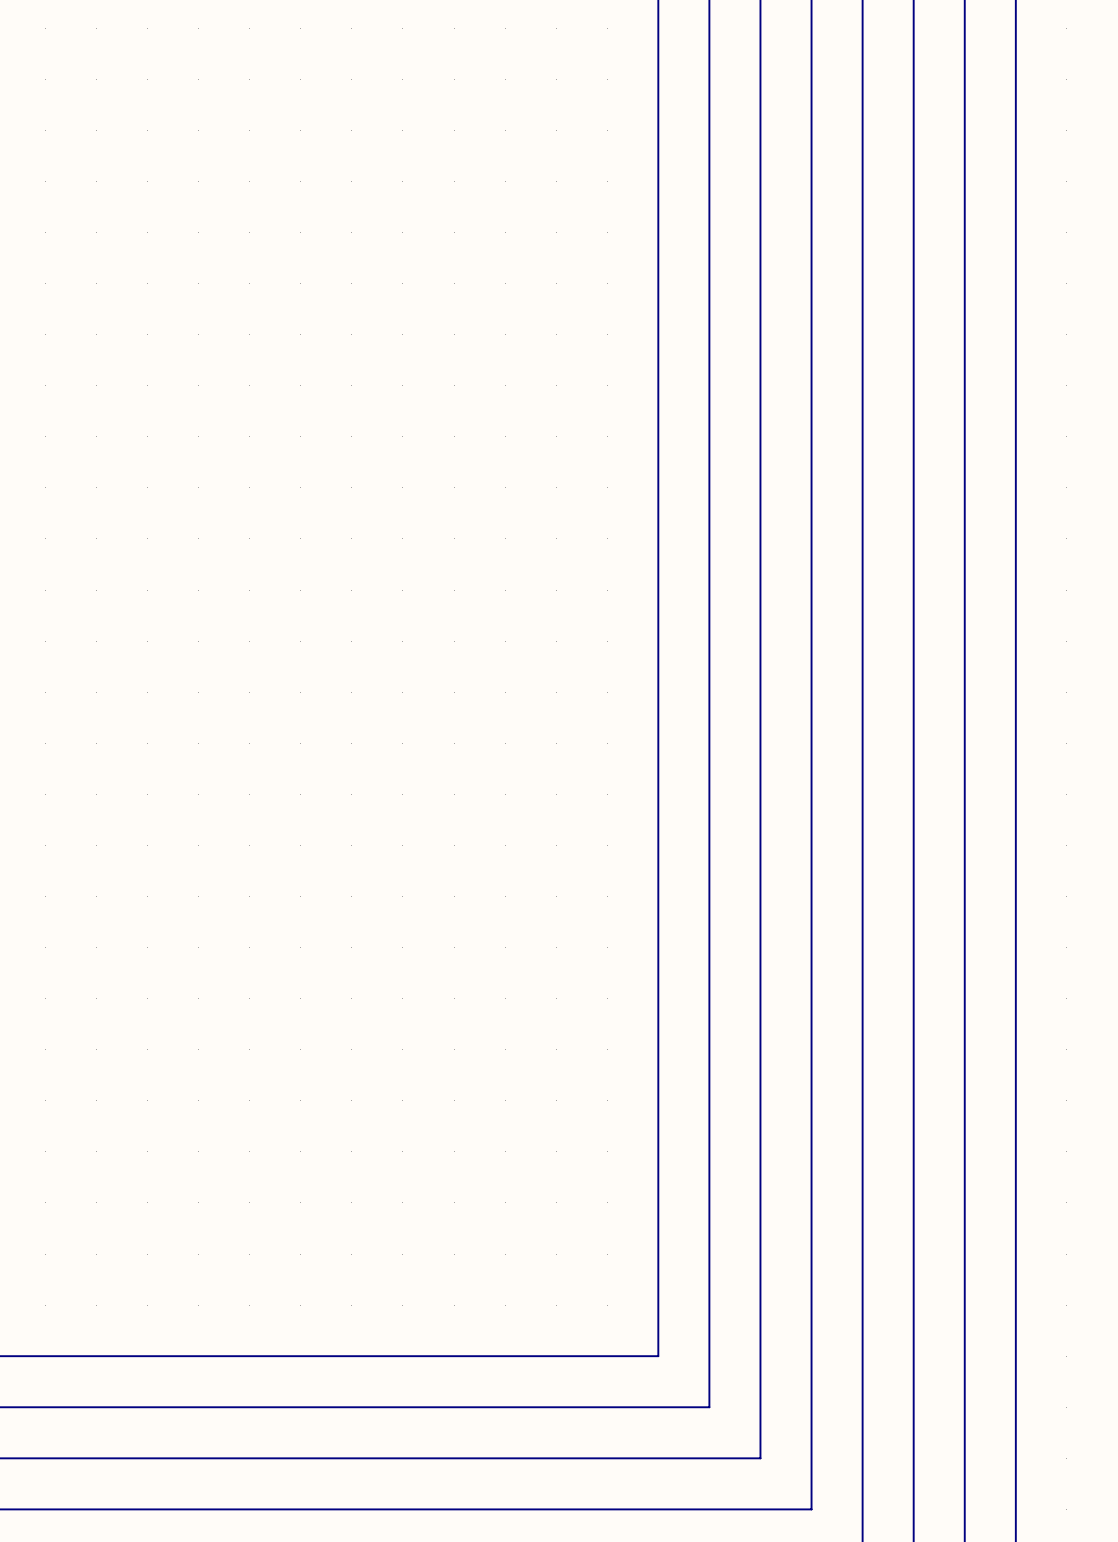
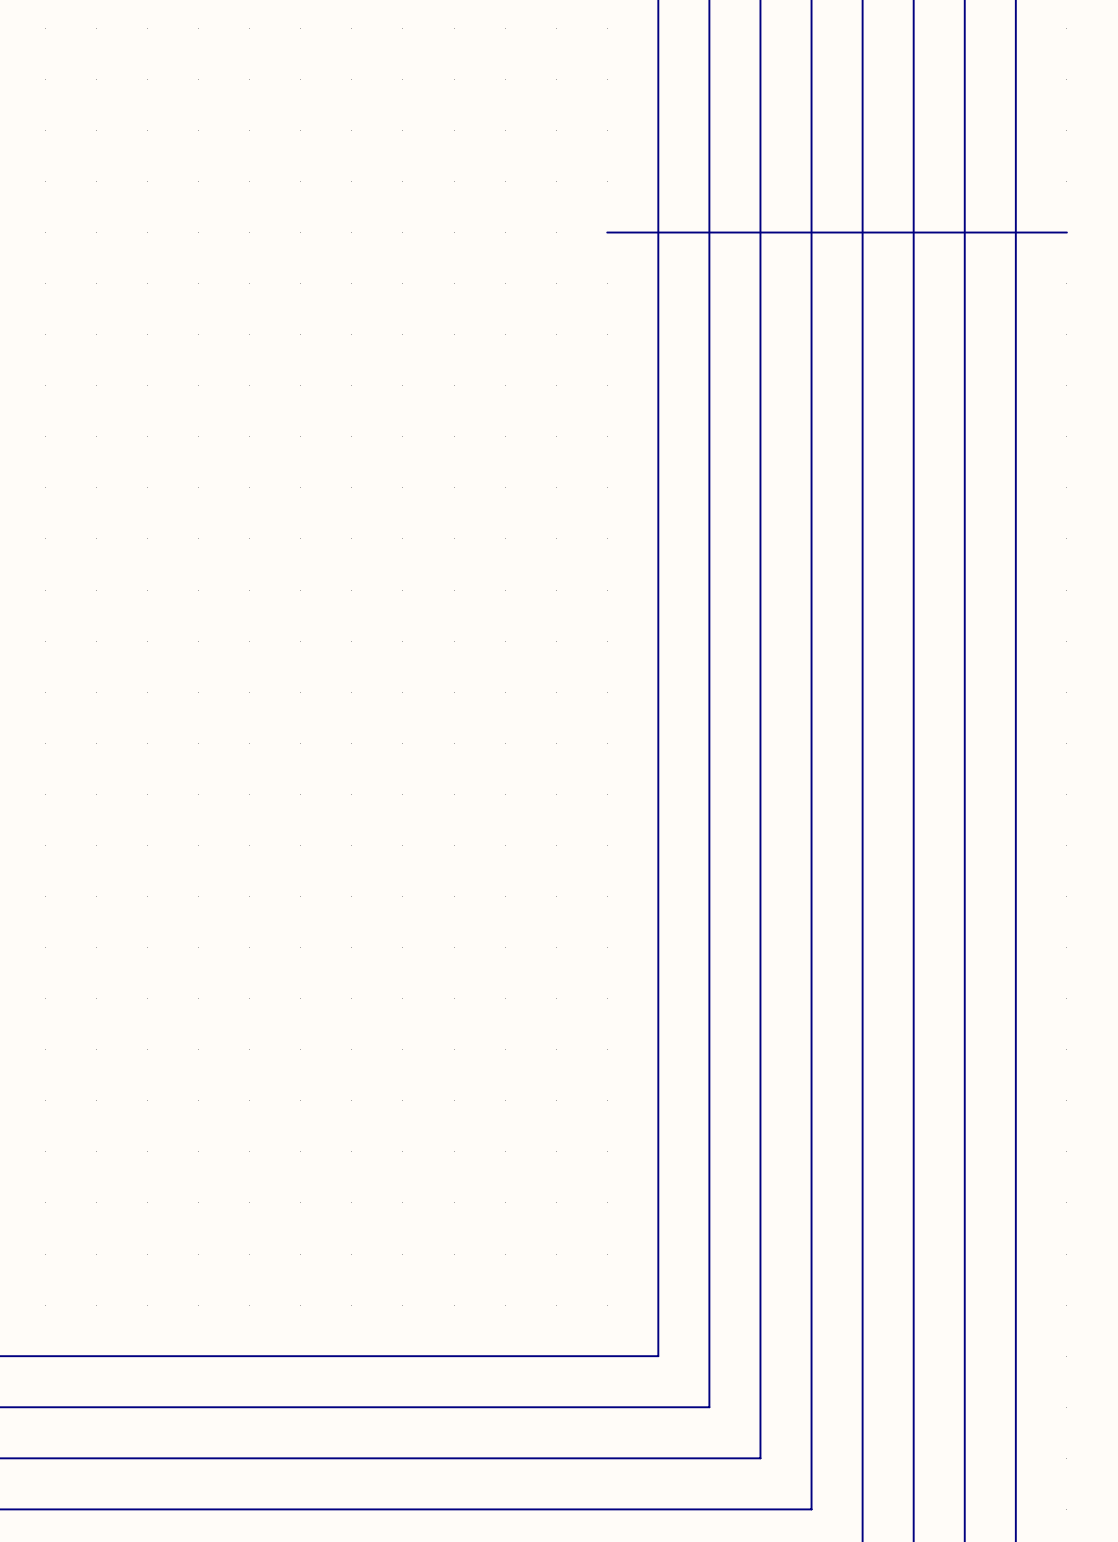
bus: none -> (607, 232) (1066, 232)

